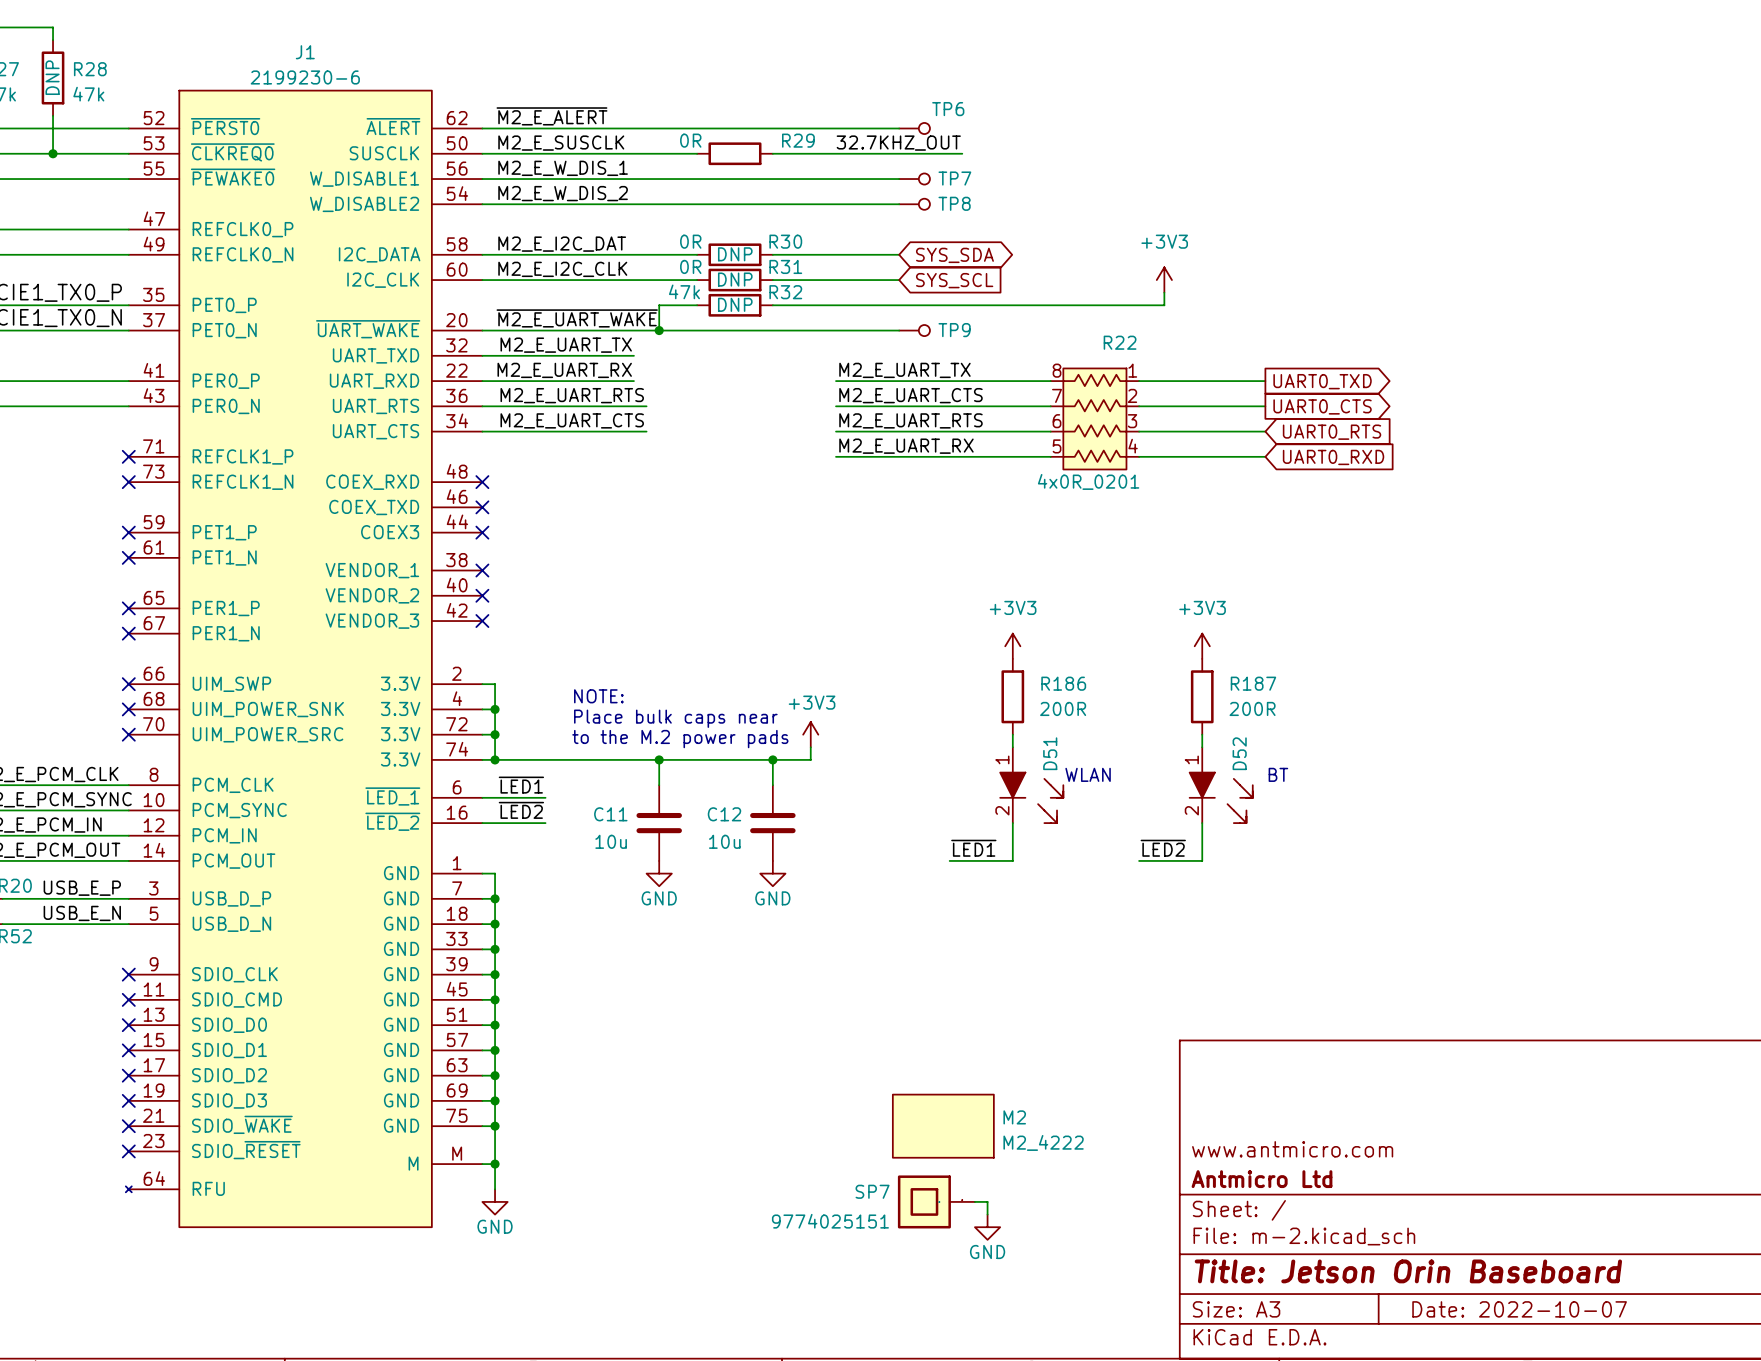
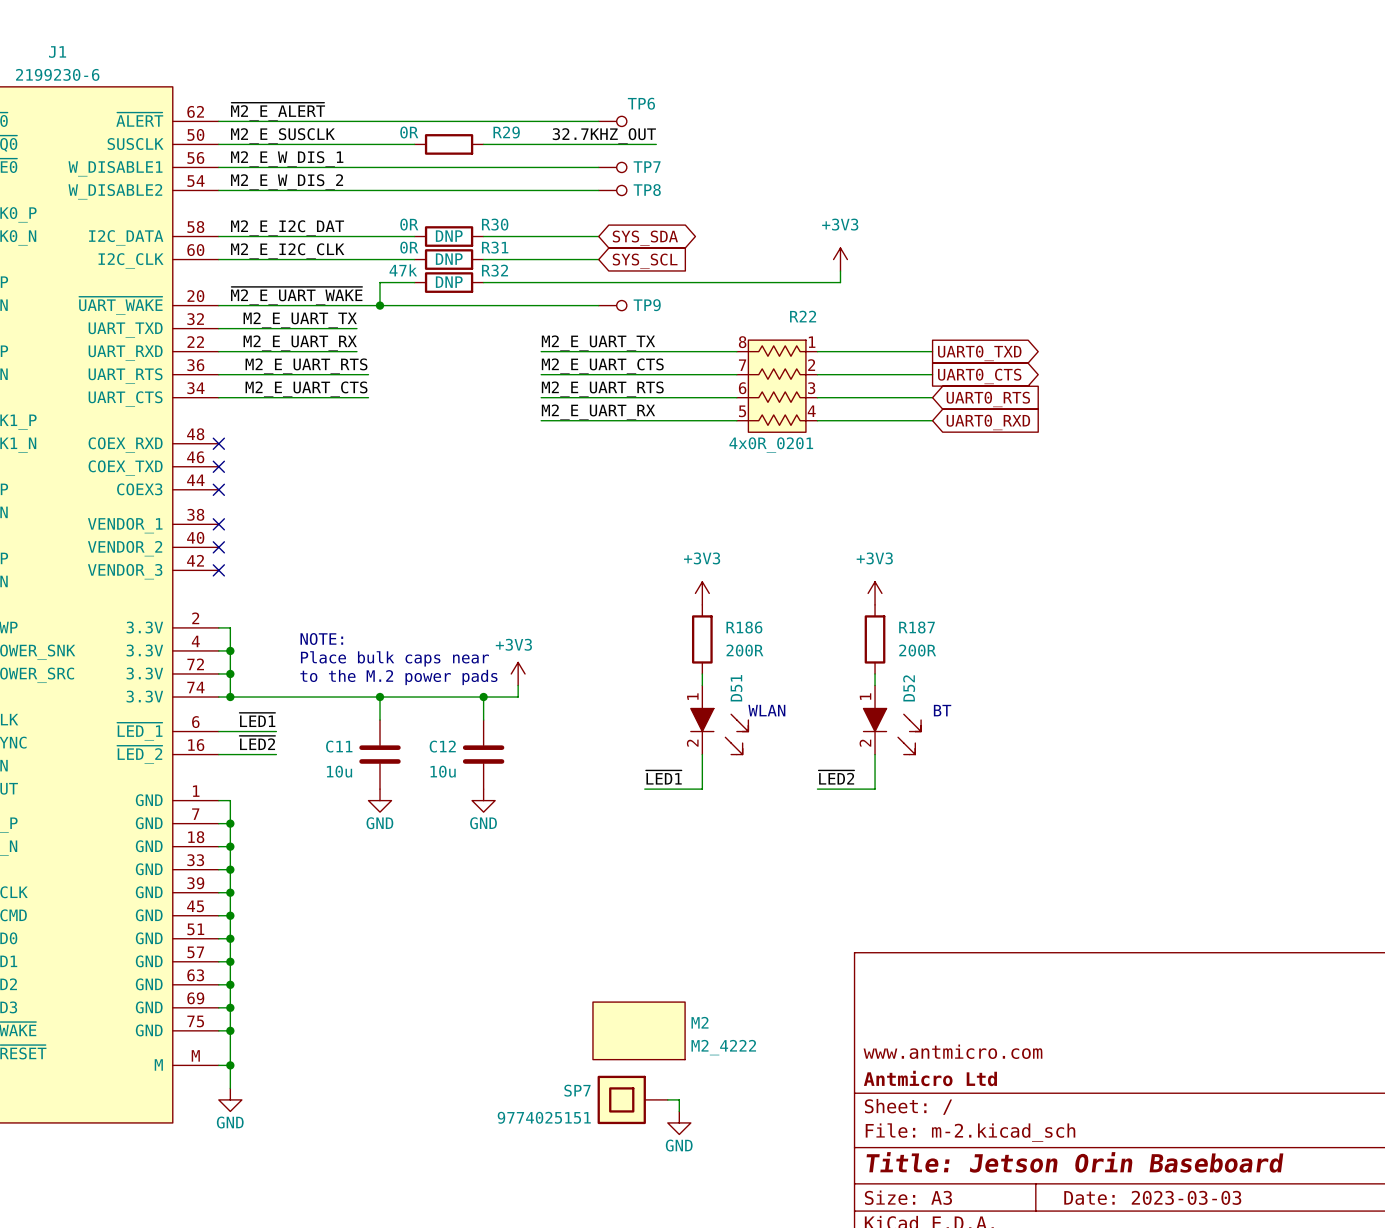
title block: Date: 2022-10-07 (1519, 1309) -> Date: 2023-03-03 (1152, 1197)

